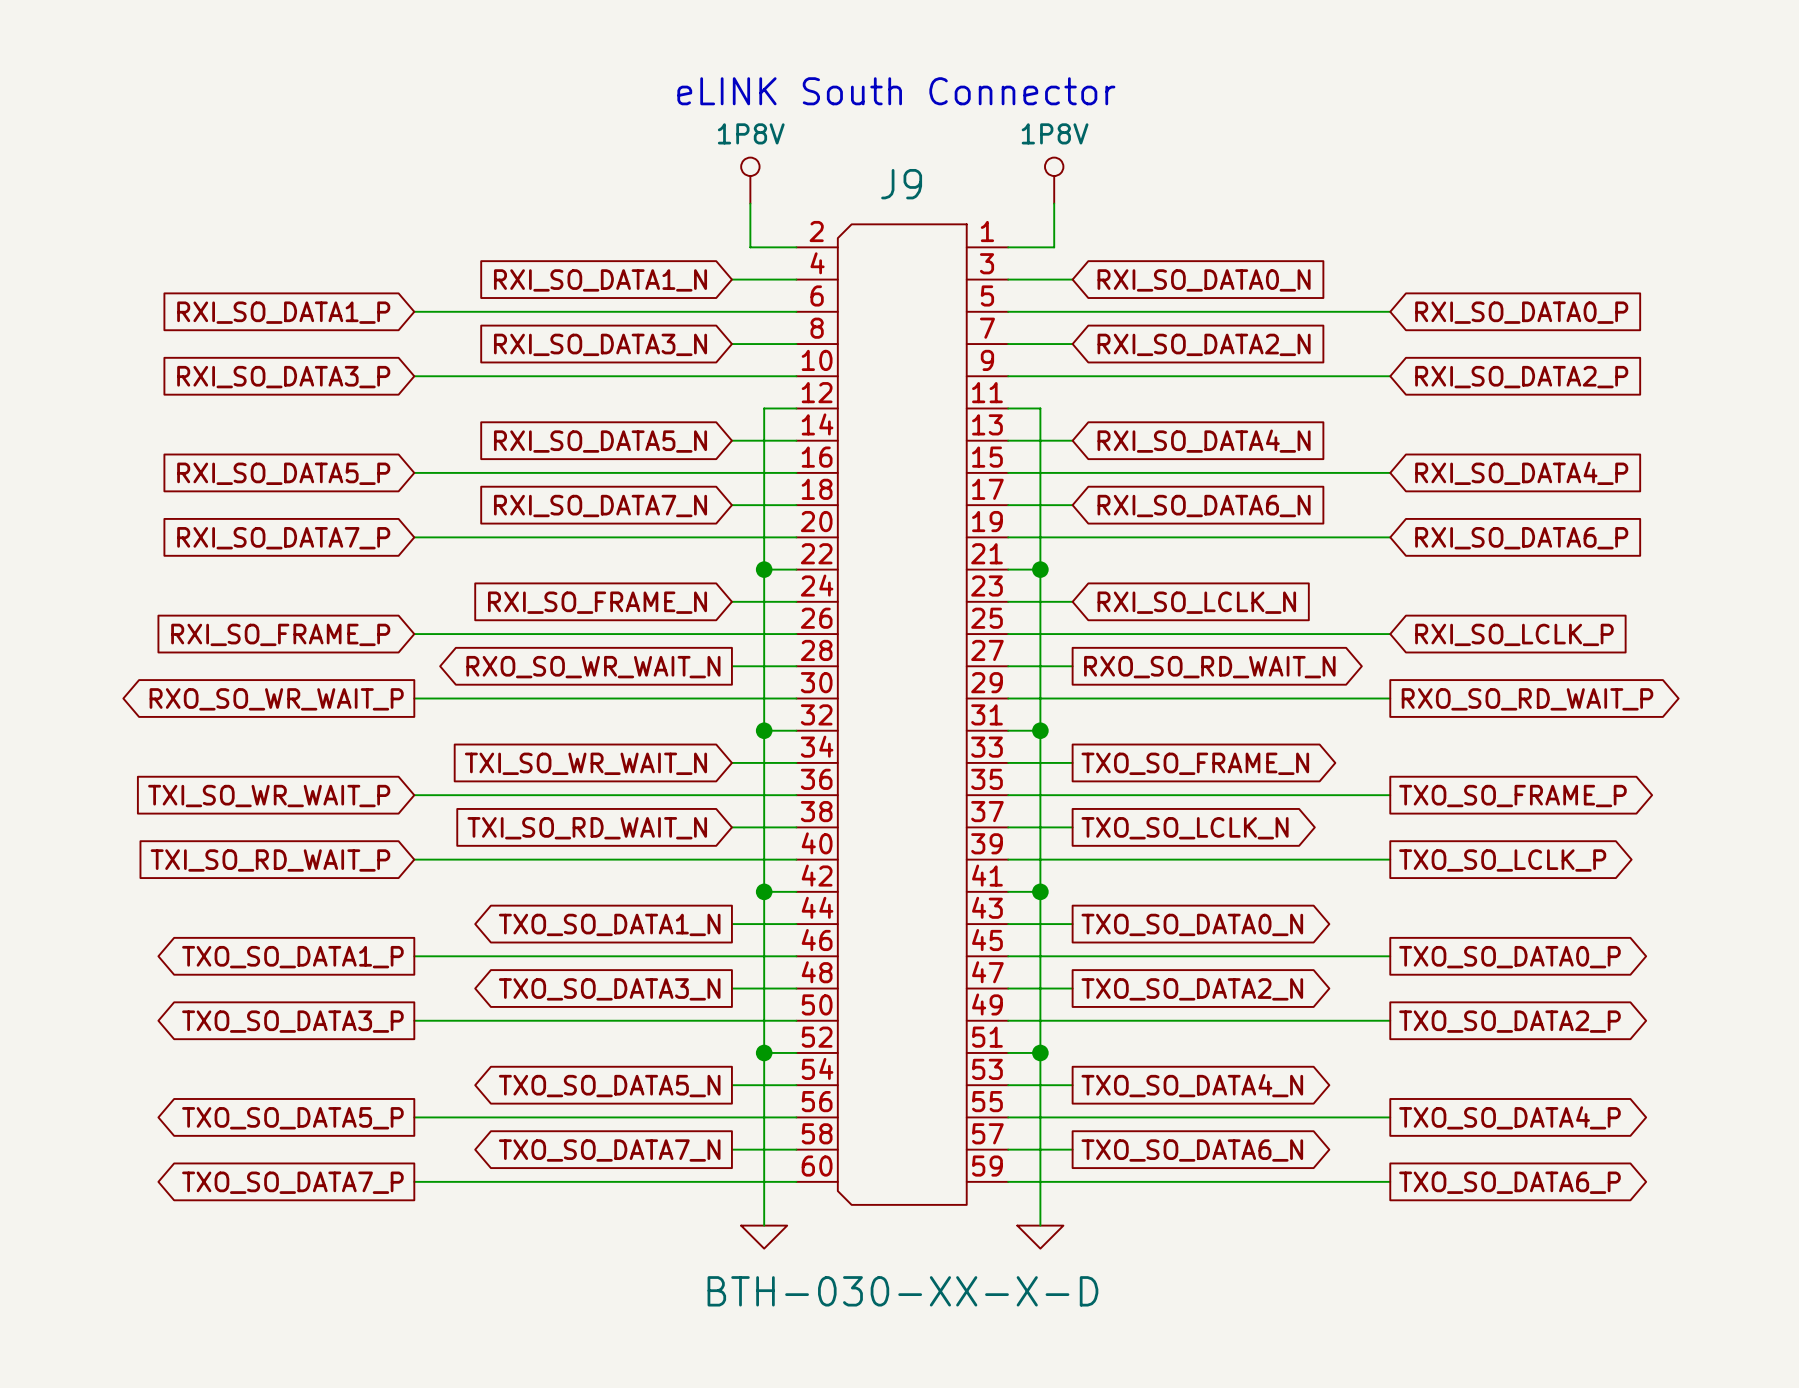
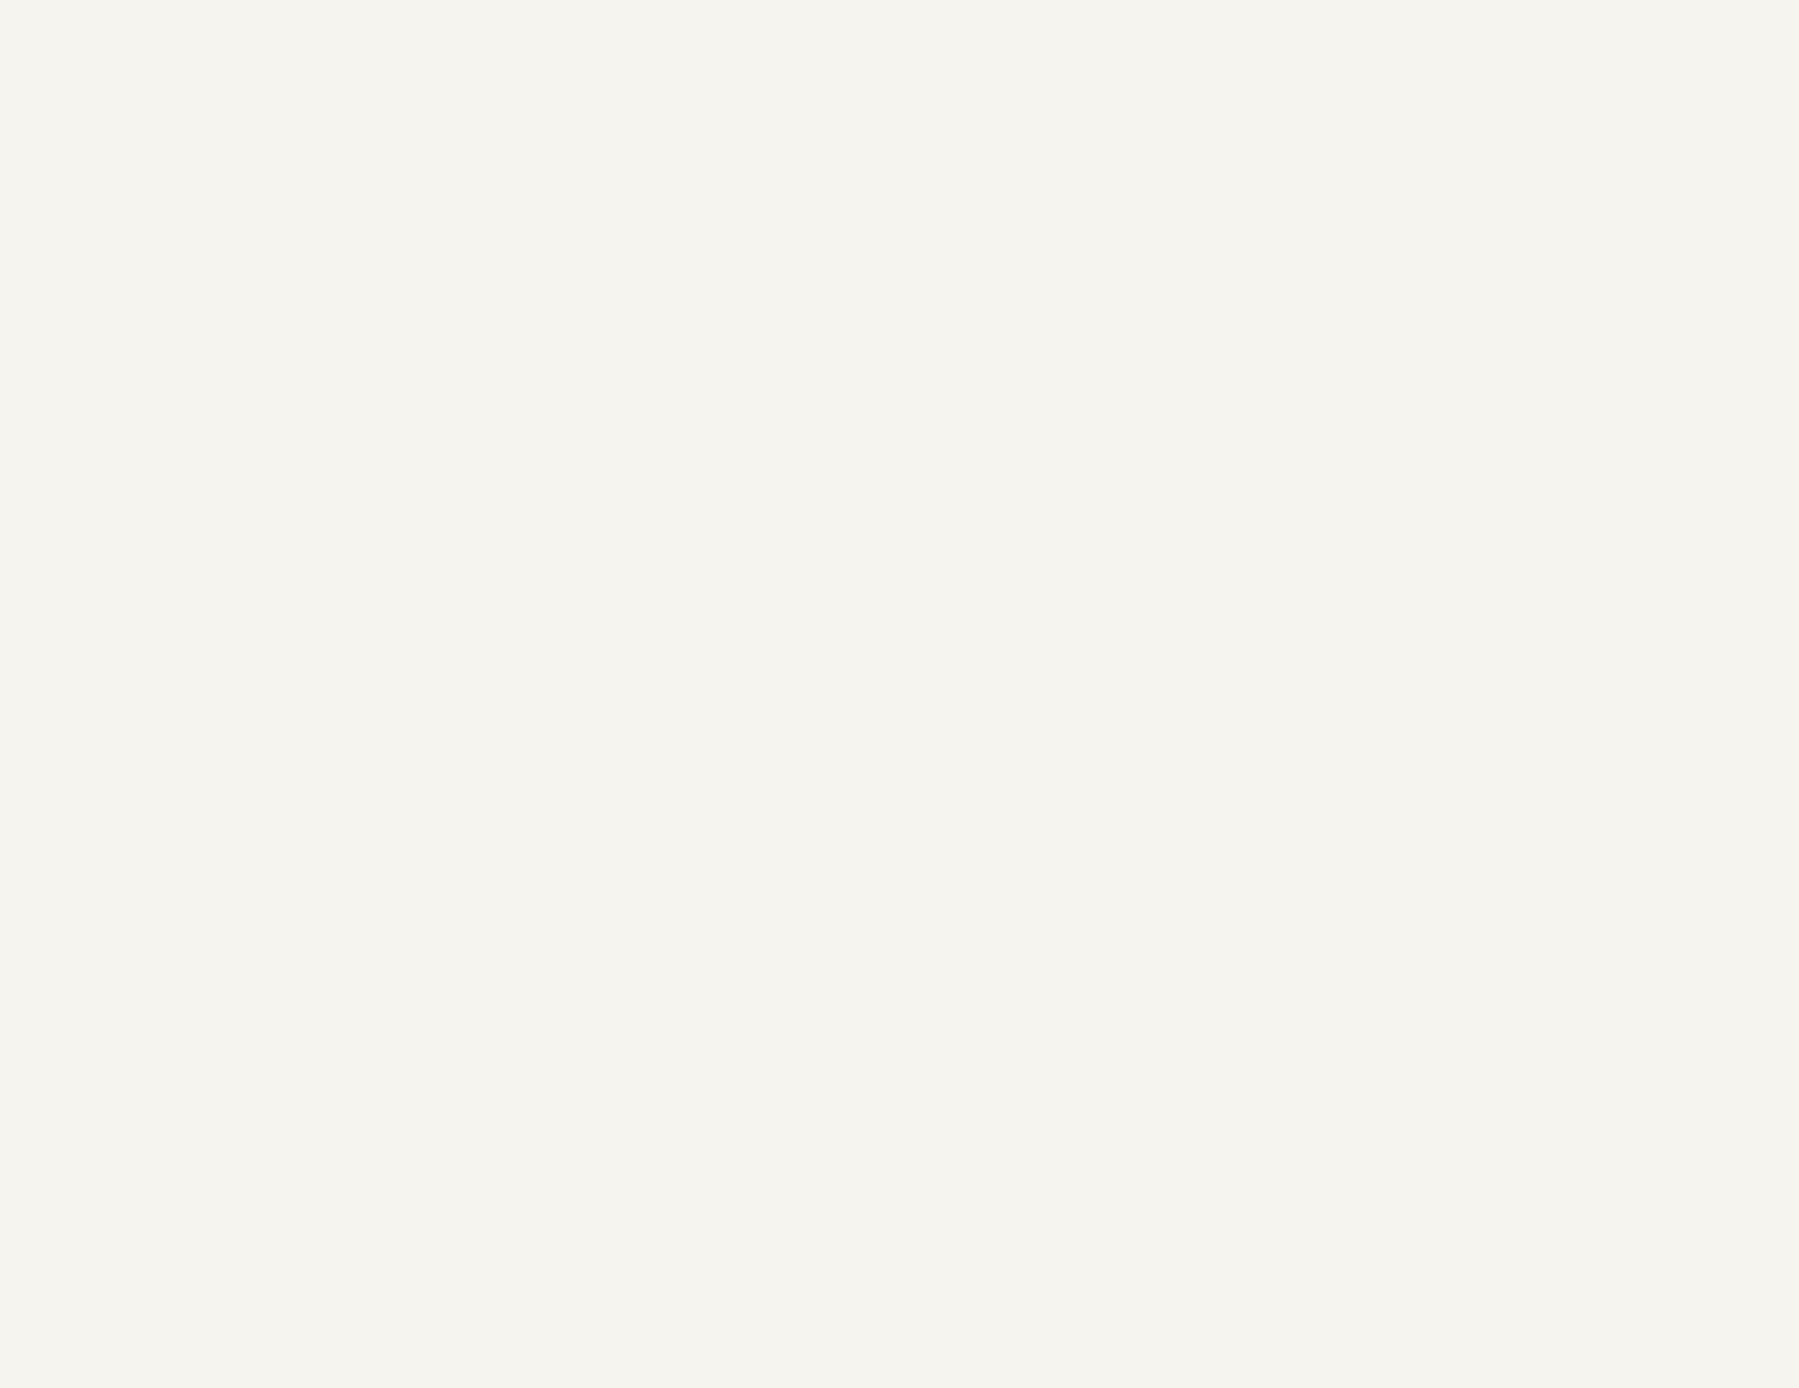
text: eLINK South Connector (896, 91) -> none
power symbol: 1P8V (750, 180) -> none
power symbol: 1P8V (1054, 180) -> none
wire: (750, 203) (750, 247) (796, 247) -> none
wire: (1054, 203) (1054, 247) (1008, 247) -> none
wire: (731, 279) (796, 279) -> none
wire: (1008, 279) (1072, 279) -> none
global label: RXI_SO_DATA1_N (600, 280) -> none
global label: RXI_SO_DATA0_N (1204, 280) -> none
wire: (414, 311) (796, 311) -> none
wire: (1008, 311) (1390, 311) -> none
global label: RXI_SO_DATA1_P (283, 312) -> none
global label: RXI_SO_DATA0_P (1521, 312) -> none
global label: RXI_SO_DATA3_N (600, 344) -> none
wire: (731, 344) (796, 344) -> none
wire: (1008, 344) (1072, 344) -> none
global label: RXI_SO_DATA2_N (1204, 344) -> none
wire: (414, 376) (796, 376) -> none
wire: (1008, 376) (1390, 376) -> none
global label: RXI_SO_DATA3_P (283, 377) -> none
global label: RXI_SO_DATA2_P (1521, 377) -> none
wire: (796, 408) (764, 408) (764, 1225) -> none
wire: (1008, 408) (1040, 408) (1040, 1225) -> none
wire: (731, 440) (796, 440) -> none
wire: (1008, 440) (1072, 440) -> none
global label: RXI_SO_DATA5_N (600, 441) -> none
global label: RXI_SO_DATA4_N (1204, 441) -> none
wire: (414, 472) (796, 472) -> none
wire: (1008, 472) (1390, 472) -> none
global label: RXI_SO_DATA5_P (283, 473) -> none
global label: RXI_SO_DATA4_P (1521, 473) -> none
wire: (731, 505) (796, 505) -> none
wire: (1008, 505) (1072, 505) -> none
global label: RXI_SO_DATA7_N (600, 506) -> none
global label: RXI_SO_DATA6_N (1204, 506) -> none
wire: (414, 537) (796, 537) -> none
wire: (1008, 537) (1390, 537) -> none
global label: RXI_SO_DATA7_P (283, 538) -> none
global label: RXI_SO_DATA6_P (1521, 538) -> none
wire: (764, 569) (796, 569) -> none
junction: (764, 569) -> none
wire: (1008, 569) (1040, 569) -> none
junction: (1040, 569) -> none
wire: (731, 601) (796, 601) -> none
wire: (1008, 601) (1072, 601) -> none
global label: RXI_SO_FRAME_N (597, 602) -> none
global label: RXI_SO_LCLK_N (1196, 602) -> none
global label: RXI_SO_FRAME_P (280, 634) -> none
wire: (414, 634) (796, 634) -> none
wire: (1008, 634) (1390, 634) -> none
global label: RXI_SO_LCLK_P (1514, 634) -> none
wire: (731, 666) (796, 666) -> none
wire: (1008, 666) (1072, 666) -> none
global label: RXO_SO_WR_WAIT_N (593, 667) -> none
global label: RXO_SO_RD_WAIT_N (1209, 667) -> none
wire: (414, 698) (796, 698) -> none
wire: (1008, 698) (1390, 698) -> none
global label: RXO_SO_WR_WAIT_P (276, 699) -> none
global label: RXO_SO_RD_WAIT_P (1527, 699) -> none
J9: BTH-030-XX-X-D (902, 714) -> none
wire: (764, 730) (796, 730) -> none
junction: (764, 730) -> none
wire: (1008, 730) (1040, 730) -> none
junction: (1040, 730) -> none
wire: (731, 762) (796, 762) -> none
wire: (1008, 762) (1072, 762) -> none
global label: TXI_SO_WR_WAIT_N (585, 763) -> none
global label: TXO_SO_FRAME_N (1195, 763) -> none
wire: (414, 795) (796, 795) -> none
wire: (1008, 795) (1390, 795) -> none
global label: TXI_SO_WR_WAIT_P (269, 796) -> none
global label: TXO_SO_FRAME_P (1512, 796) -> none
wire: (731, 827) (796, 827) -> none
wire: (1008, 827) (1072, 827) -> none
global label: TXI_SO_RD_WAIT_N (587, 828) -> none
global label: TXO_SO_LCLK_N (1185, 828) -> none
wire: (414, 859) (796, 859) -> none
wire: (1008, 859) (1390, 859) -> none
global label: TXI_SO_RD_WAIT_P (270, 860) -> none
global label: TXO_SO_LCLK_P (1502, 860) -> none
wire: (764, 891) (796, 891) -> none
junction: (764, 891) -> none
wire: (1008, 891) (1040, 891) -> none
junction: (1040, 891) -> none
global label: TXO_SO_DATA1_N (609, 924) -> none
wire: (731, 924) (796, 924) -> none
wire: (1008, 924) (1072, 924) -> none
global label: TXO_SO_DATA0_N (1192, 924) -> none
wire: (414, 956) (796, 956) -> none
wire: (1008, 956) (1390, 956) -> none
global label: TXO_SO_DATA1_P (292, 957) -> none
global label: TXO_SO_DATA0_P (1509, 957) -> none
wire: (731, 988) (796, 988) -> none
wire: (1008, 988) (1072, 988) -> none
global label: TXO_SO_DATA3_N (609, 989) -> none
global label: TXO_SO_DATA2_N (1192, 989) -> none
wire: (414, 1020) (796, 1020) -> none
wire: (1008, 1020) (1390, 1020) -> none
global label: TXO_SO_DATA3_P (292, 1021) -> none
global label: TXO_SO_DATA2_P (1509, 1021) -> none
wire: (764, 1052) (796, 1052) -> none
junction: (764, 1052) -> none
wire: (1008, 1052) (1040, 1052) -> none
junction: (1040, 1052) -> none
wire: (731, 1085) (796, 1085) -> none
wire: (1008, 1085) (1072, 1085) -> none
global label: TXO_SO_DATA4_N (1192, 1085) -> none
global label: TXO_SO_DATA5_N (609, 1086) -> none
wire: (414, 1117) (796, 1117) -> none
wire: (1008, 1117) (1390, 1117) -> none
global label: TXO_SO_DATA4_P (1509, 1117) -> none
global label: TXO_SO_DATA5_P (292, 1118) -> none
wire: (731, 1149) (796, 1149) -> none
wire: (1008, 1149) (1072, 1149) -> none
global label: TXO_SO_DATA7_N (609, 1150) -> none
global label: TXO_SO_DATA6_N (1192, 1150) -> none
wire: (414, 1181) (796, 1181) -> none
wire: (1008, 1181) (1390, 1181) -> none
global label: TXO_SO_DATA7_P (292, 1182) -> none
global label: TXO_SO_DATA6_P (1509, 1182) -> none
power symbol: (764, 1237) -> none
power symbol: (1040, 1237) -> none

